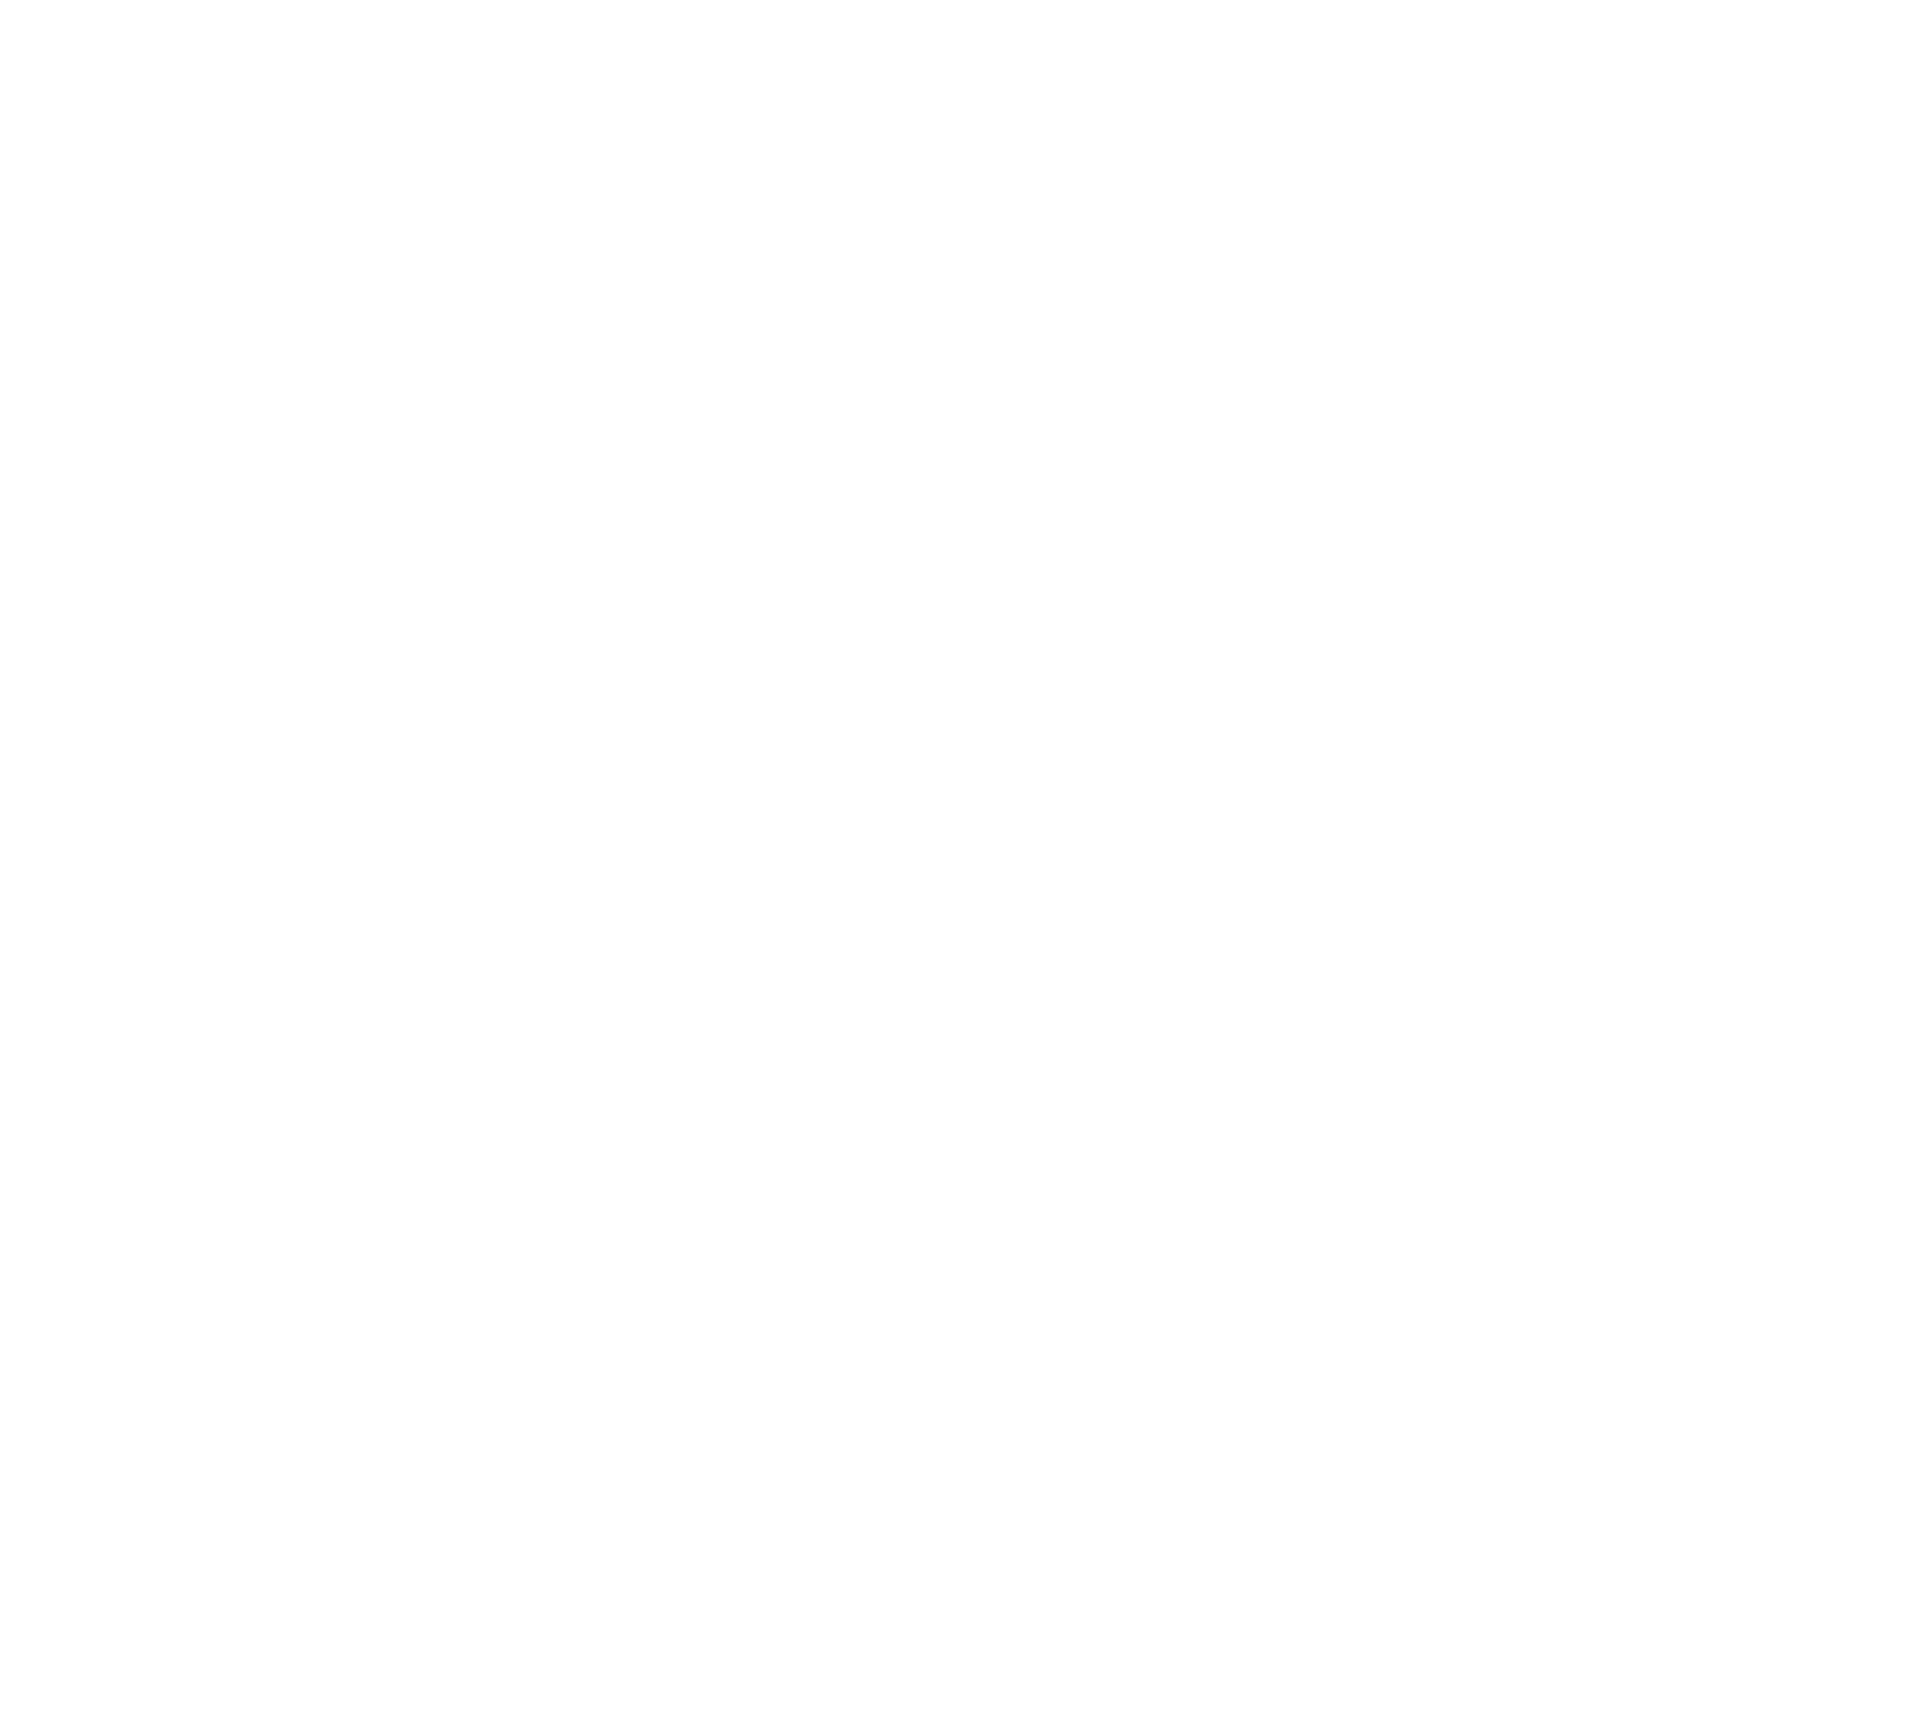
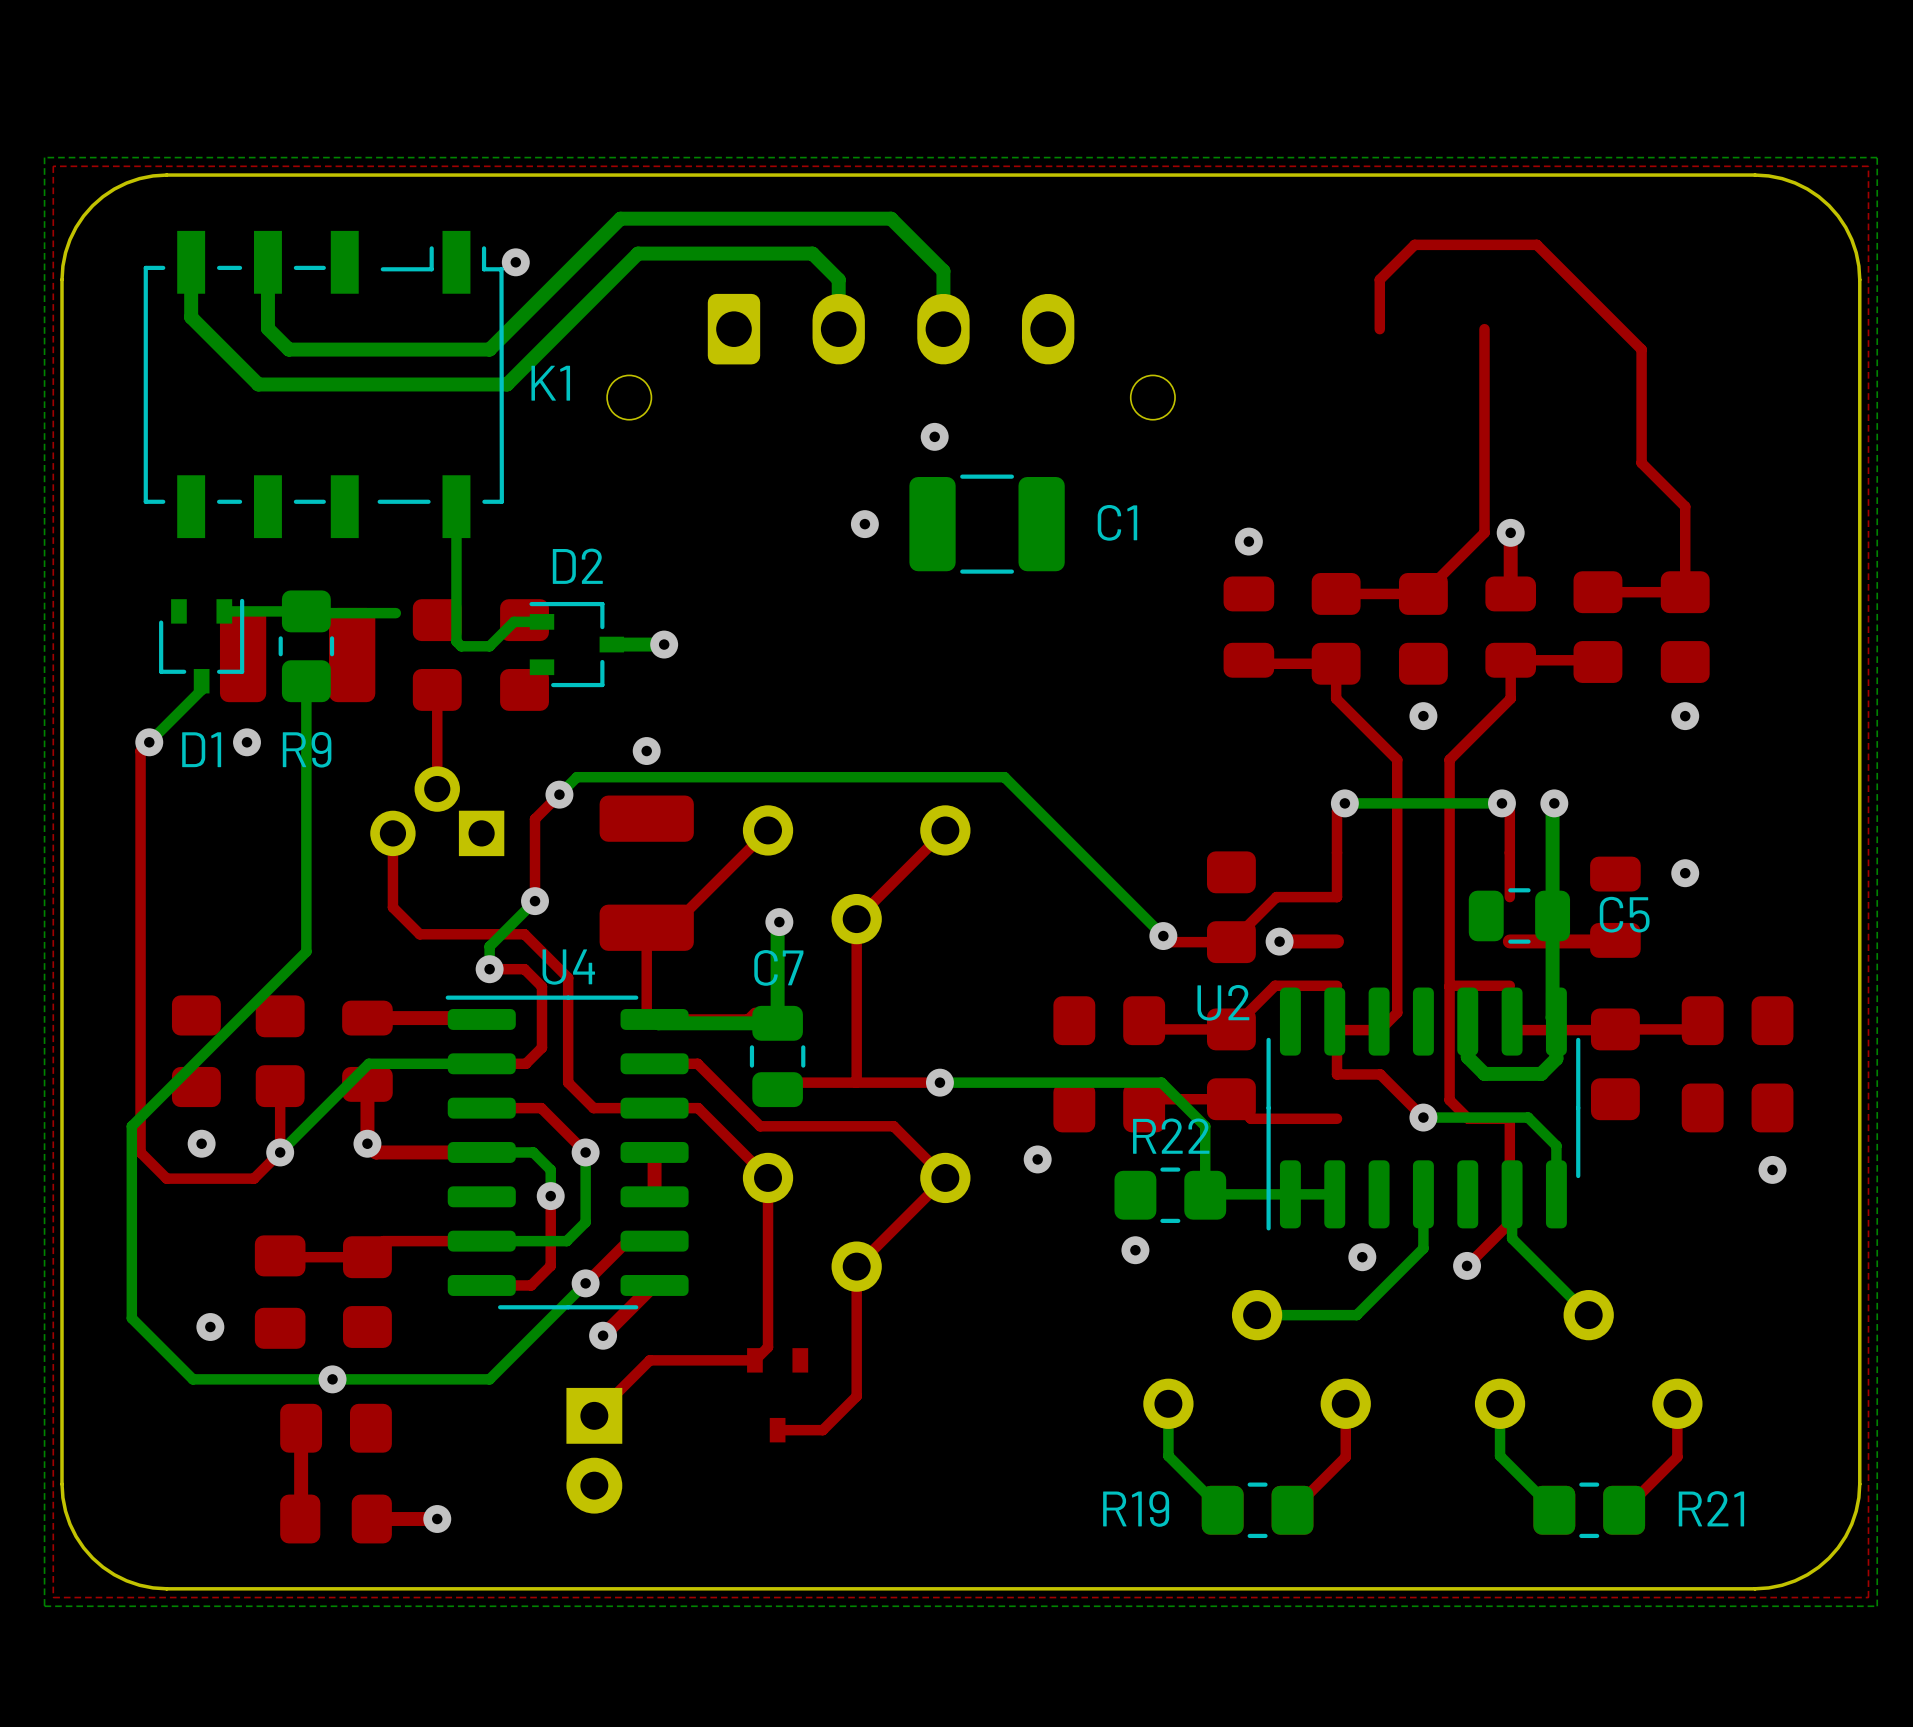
bottom zone outline: none -> (1877, 157) (1877, 1606) (44, 1606) (44, 157) (1877, 157)
top zone outline: none -> (1868, 166) (1868, 1597) (53, 1597) (53, 166) (1868, 166)
board edge: none -> (1755, 175) (166, 175) (139, 178) (114, 189) (102, 196) (83, 216) (76, 227) (65, 252) (62, 279) (62, 1484) (62, 1497) (69, 1524) (83, 1547) (102, 1567) (126, 1580) (153, 1587) (166, 1588) (1755, 1588) (1768, 1587) (1795, 1580) (1818, 1567) (1838, 1547) (1851, 1524) (1858, 1497) (1859, 1484) (1859, 279) (1856, 252) (1851, 239) (1838, 216) (1829, 205) (1818, 196) (1795, 183) (1782, 178) (1755, 175)
bottom track: none -> (191, 262) (191, 317) (258, 384) (507, 384) (637, 253) (812, 253) (838, 279) (838, 329)
bottom track: none -> (267, 262) (267, 328) (288, 349) (489, 349) (620, 218) (891, 218) (943, 271) (943, 329)
via: none -> (515, 262)
top track: none -> (1379, 329) (1379, 279) (1414, 244) (1536, 244) (1641, 349) (1641, 463) (1685, 506) (1685, 592) (1597, 592)
top track: none -> (1484, 329) (1484, 532) (1423, 593) (1336, 593)
part: none -> (891, 356)
K1: none -> (323, 384)
via: none -> (934, 436)
bottom track: none -> (456, 506) (456, 641) (461, 646) (489, 646) (514, 621) (541, 621)
via: none -> (864, 524)
C1: none -> (987, 524)
top track: none -> (1510, 532) (1510, 593)
via: none -> (1510, 532)
via: none -> (1248, 541)
bottom track: none -> (224, 611) (395, 613)
part: none -> (1248, 627)
part: none -> (1510, 627)
part: none -> (1597, 627)
part: none -> (1685, 627)
part: none -> (1336, 628)
part: none -> (1423, 628)
D2: none -> (576, 644)
bottom track: none -> (664, 644) (611, 644)
via: none -> (664, 644)
D1: none -> (201, 646)
R9: none -> (306, 646)
part: none -> (297, 655)
part: none -> (437, 655)
part: none -> (524, 655)
top track: none -> (1248, 660) (1252, 663) (1336, 663) (1336, 698) (1397, 759) (1397, 1012) (1379, 1030) (1337, 1030) (1337, 1074) (1380, 1074) (1423, 1117)
top track: none -> (1597, 662) (1596, 660) (1510, 660) (1510, 698) (1449, 759) (1449, 1100) (1468, 1118) (1509, 1118) (1509, 1223) (1467, 1265)
bottom track: none -> (201, 681) (201, 689) (149, 742)
bottom track: none -> (306, 681) (306, 951) (131, 1126) (131, 1318) (192, 1379) (489, 1379) (585, 1283)
top track: none -> (437, 689) (437, 789)
via: none -> (1423, 716)
via: none -> (1685, 716)
top track: none -> (149, 742) (140, 751) (140, 1152) (166, 1178) (254, 1178) (280, 1152) (280, 1086)
via: none -> (149, 742)
via: none -> (247, 742)
via: none -> (646, 751)
top track: none -> (559, 794) (535, 819) (535, 901)
bottom track: none -> (559, 794) (576, 777) (1004, 777) (1163, 936)
via: none -> (559, 794)
top track: none -> (1344, 803) (1337, 811) (1337, 897) (1276, 897) (1231, 942) (1169, 942) (1163, 936)
via: none -> (1344, 803)
top track: none -> (1501, 803) (1509, 811) (1509, 897)
bottom track: none -> (1501, 803) (1344, 803)
via: none -> (1501, 803)
bottom track: none -> (1554, 803) (1552, 805) (1552, 1017) (1556, 1021) (1556, 1058) (1541, 1073) (1484, 1073) (1467, 1057) (1467, 1021)
via: none -> (1554, 803)
part: none -> (437, 811)
top track: none -> (768, 830) (670, 927) (646, 927) (646, 1011) (654, 1019) (748, 1019) (754, 1012)
top track: none -> (945, 830) (856, 919) (856, 1082)
top track: none -> (392, 833) (392, 907) (419, 934) (524, 934) (568, 977) (568, 1082) (593, 1108) (698, 1108) (768, 1177) (768, 1347) (754, 1360) (649, 1360) (594, 1415)
part: none -> (646, 873)
via: none -> (1685, 873)
part: none -> (856, 874)
bottom track: none -> (535, 901) (489, 946) (489, 969)
via: none -> (535, 901)
part: none -> (1231, 907)
part: none -> (1615, 907)
C5: none -> (1519, 915)
bottom track: none -> (779, 922) (777, 923) (777, 1023) (658, 1023) (654, 1019)
via: none -> (779, 922)
via: none -> (1163, 936)
top track: none -> (1615, 940) (1509, 941)
via: none -> (1279, 941)
top track: none -> (1337, 941) (1279, 941)
top track: none -> (489, 969) (524, 969) (541, 986) (541, 1047) (525, 1063) (481, 1063)
via: none -> (489, 969)
top track: none -> (1337, 985) (1275, 985) (1231, 1029) (1152, 1029) (1144, 1020)
top track: none -> (1509, 985) (1449, 986)
top track: none -> (367, 1018) (481, 1019)
part: none -> (1109, 1020)
top track: none -> (1702, 1020) (1693, 1029) (1509, 1030)
part: none -> (1737, 1020)
part: none -> (196, 1051)
part: none -> (280, 1051)
part: none -> (367, 1051)
C7: none -> (777, 1056)
bottom track: none -> (481, 1063) (368, 1063) (280, 1152)
top track: none -> (654, 1063) (697, 1063) (760, 1126) (893, 1126) (945, 1177) (856, 1266) (856, 1396) (822, 1430) (777, 1430)
part: none -> (1231, 1064)
part: none -> (1615, 1064)
top track: none -> (939, 1082) (777, 1082)
bottom track: none -> (939, 1082) (1161, 1082) (1205, 1126) (1205, 1195) (1334, 1194)
via: none -> (939, 1082)
top track: none -> (367, 1084) (367, 1143) (376, 1152) (481, 1152)
part: none -> (1109, 1107)
top track: none -> (1144, 1107) (1152, 1099) (1231, 1099) (1250, 1118) (1337, 1118)
part: none -> (1737, 1107)
top track: none -> (481, 1108) (541, 1108) (585, 1152)
U2: none -> (1423, 1109)
bottom track: none -> (1423, 1117) (1528, 1117) (1556, 1145) (1556, 1194)
via: none -> (1423, 1117)
via: none -> (201, 1143)
via: none -> (367, 1143)
via: none -> (280, 1152)
bottom track: none -> (481, 1152) (533, 1152) (550, 1169) (550, 1196)
U4: none -> (567, 1152)
bottom track: none -> (585, 1152) (585, 1222) (566, 1241) (481, 1241)
via: none -> (585, 1152)
top track: none -> (654, 1152) (654, 1196)
via: none -> (1037, 1159)
via: none -> (1772, 1169)
bottom track: none -> (1423, 1194) (1423, 1248) (1356, 1315) (1257, 1315)
bottom track: none -> (1512, 1194) (1512, 1238) (1588, 1315)
R22: none -> (1170, 1195)
top track: none -> (550, 1196) (550, 1265) (531, 1285) (481, 1285)
via: none -> (550, 1196)
part: none -> (856, 1222)
top track: none -> (481, 1241) (383, 1241) (367, 1257) (280, 1255)
top track: none -> (654, 1241) (627, 1241) (585, 1283)
via: none -> (1135, 1250)
via: none -> (1362, 1257)
via: none -> (1467, 1265)
via: none -> (585, 1283)
top track: none -> (654, 1285) (603, 1335)
part: none -> (280, 1292)
part: none -> (367, 1292)
via: none -> (210, 1327)
via: none -> (603, 1335)
part: none -> (1257, 1359)
part: none -> (1588, 1359)
via: none -> (332, 1379)
part: none -> (777, 1395)
bottom track: none -> (1168, 1403) (1168, 1455) (1222, 1510)
top track: none -> (1345, 1403) (1345, 1457) (1292, 1510)
bottom track: none -> (1500, 1403) (1500, 1455) (1554, 1510)
top track: none -> (1677, 1403) (1677, 1457) (1624, 1510)
top track: none -> (301, 1428) (300, 1519)
part: none -> (336, 1428)
part: none -> (594, 1450)
R19: none -> (1257, 1510)
R21: none -> (1589, 1510)
part: none -> (336, 1519)
top track: none -> (437, 1519) (371, 1519)
via: none -> (437, 1519)

